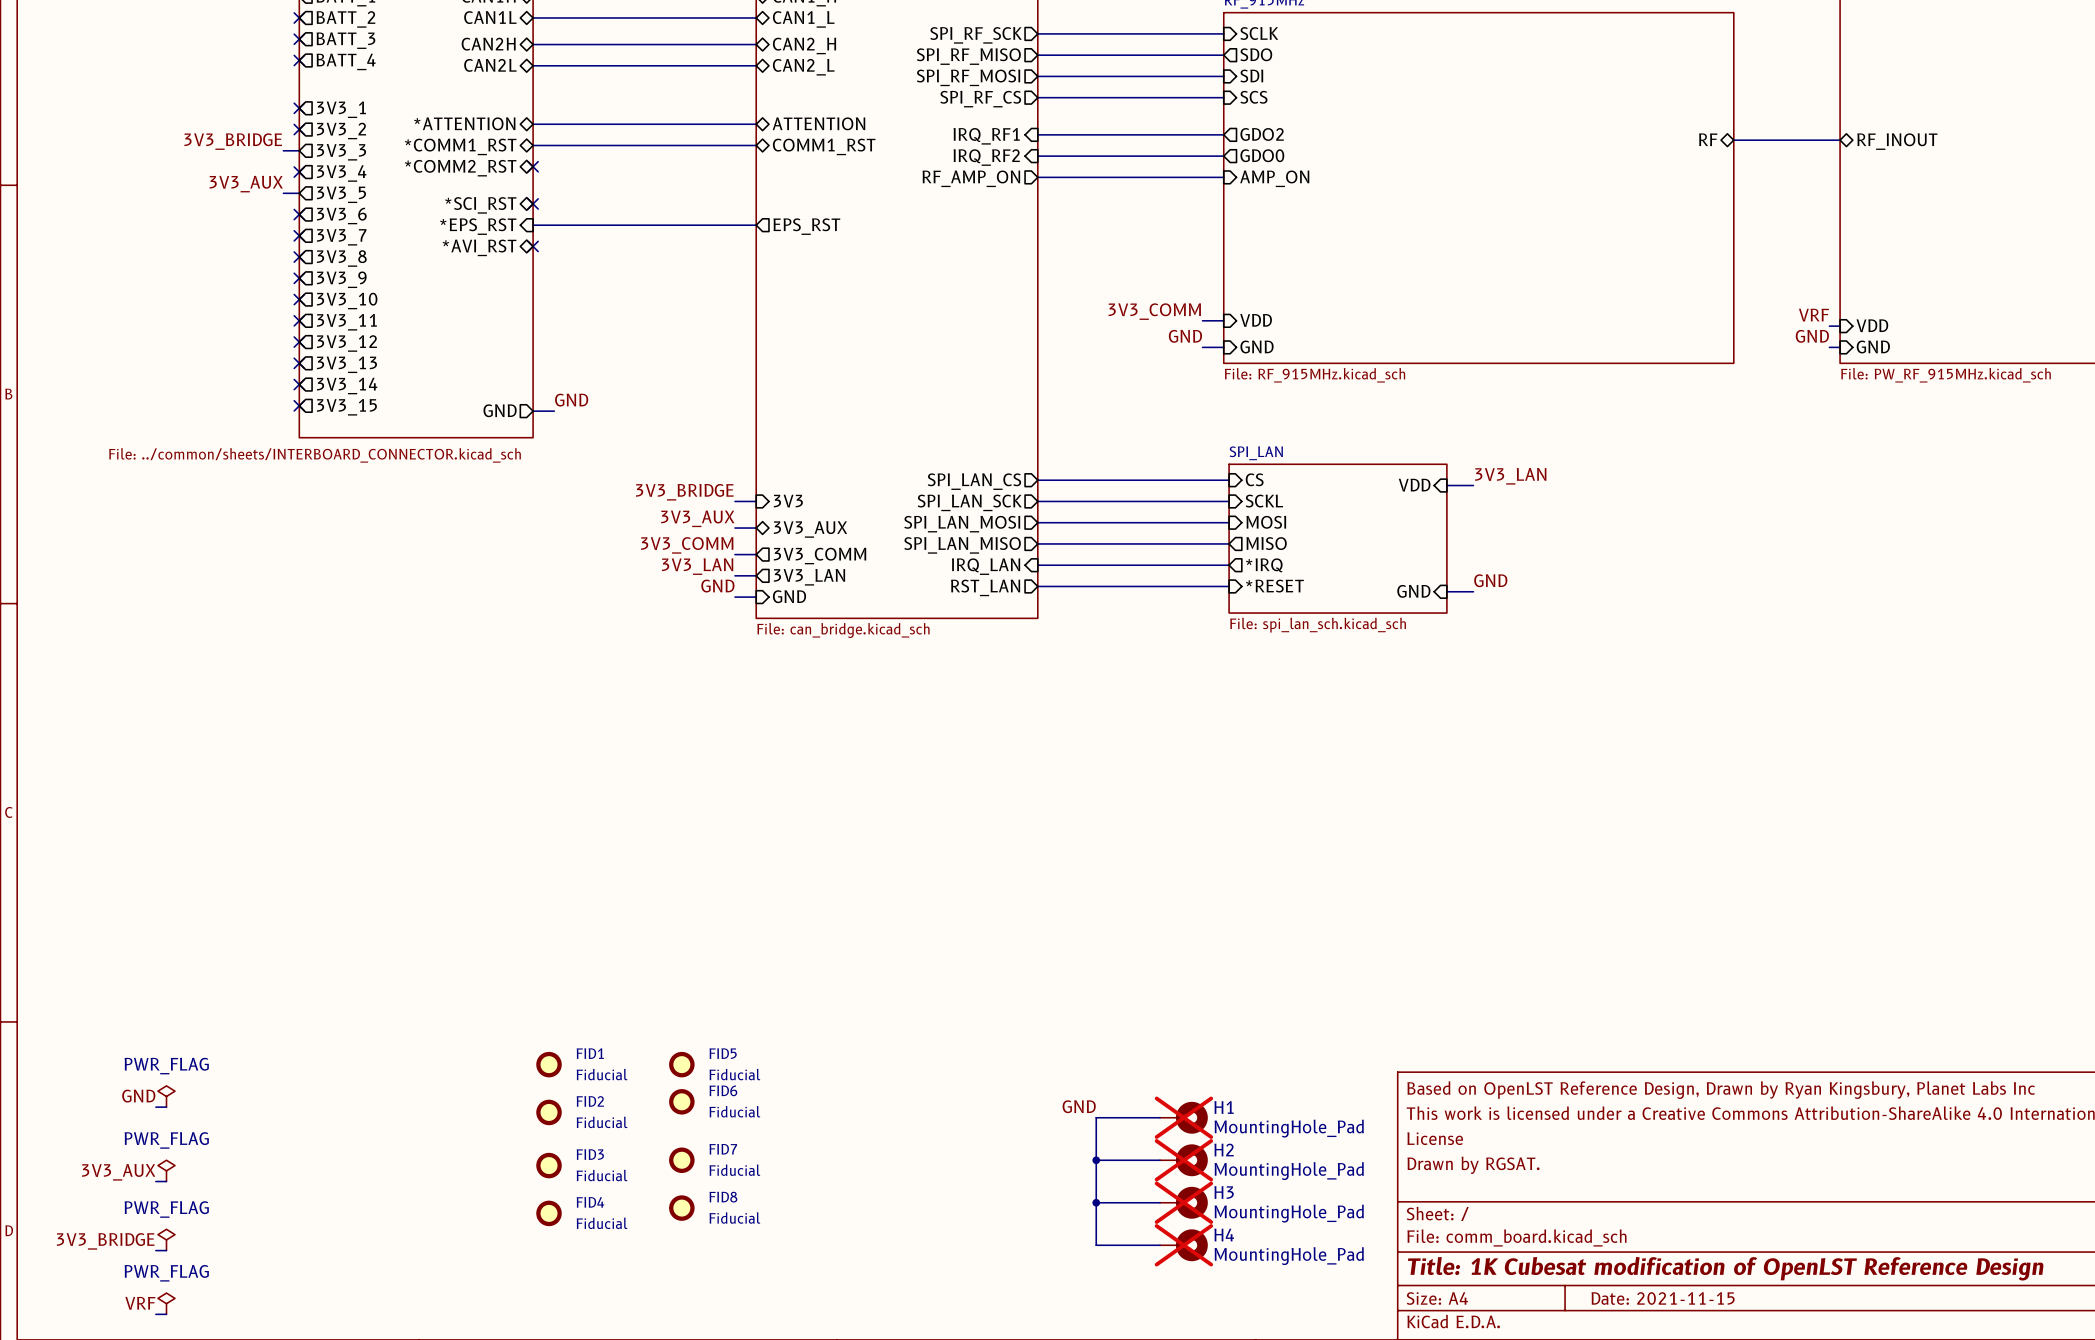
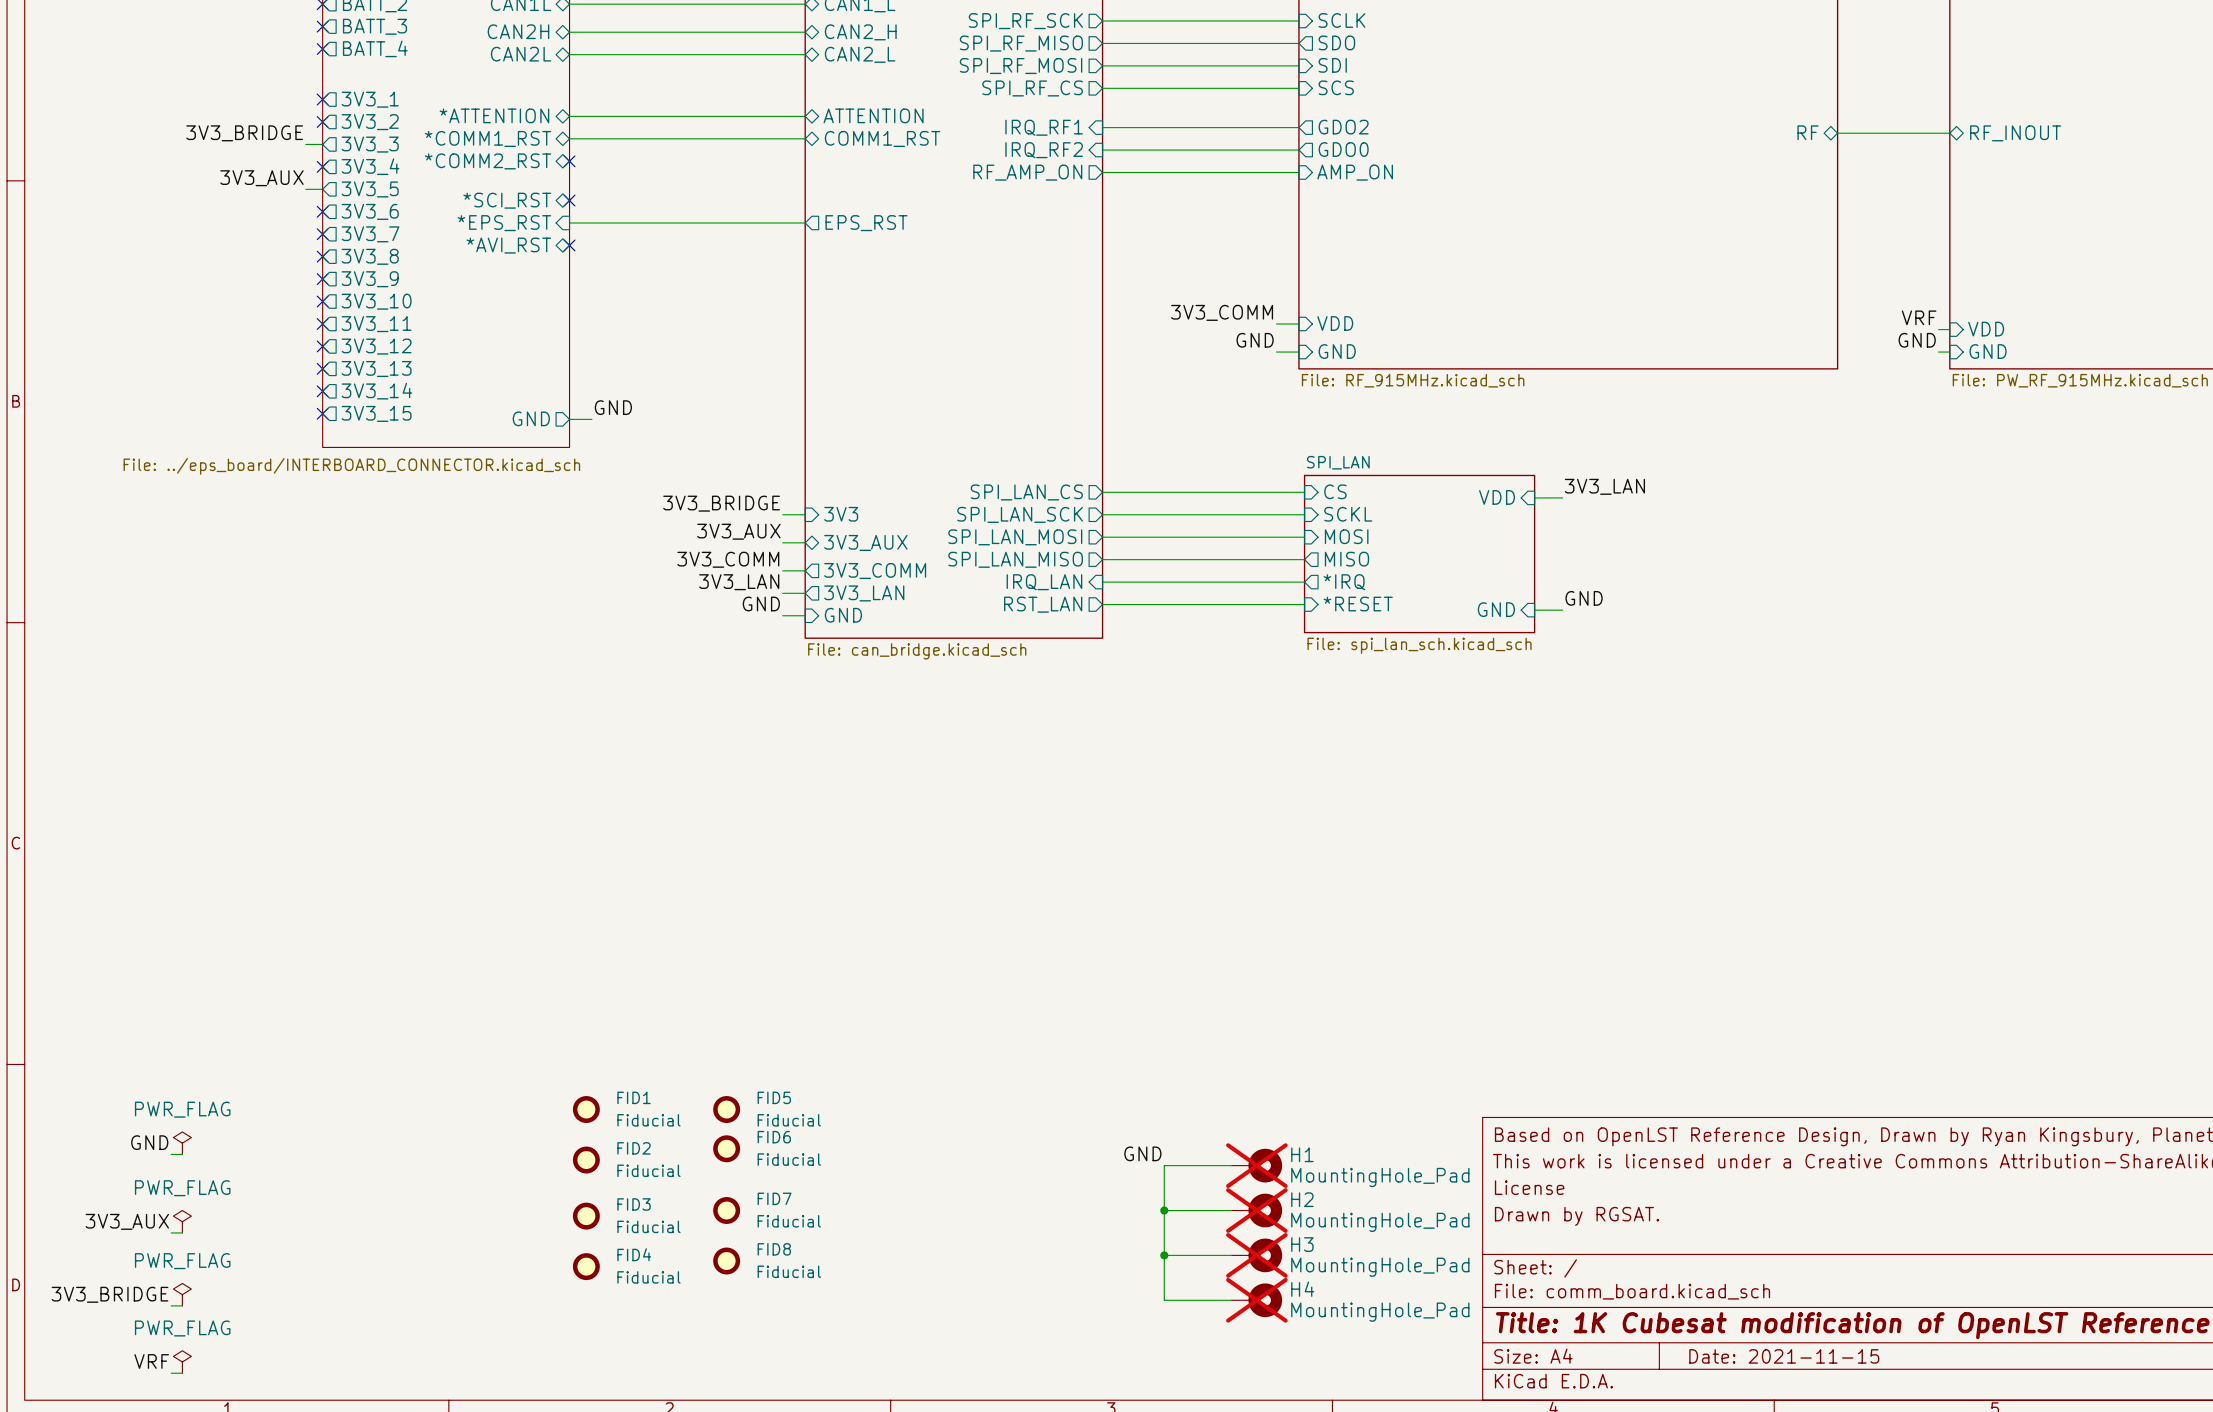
sheet value: File: ../common/sheets/INTERBOARD_CONNECTOR.kicad_sch (315, 455) -> File: ../eps_board/INTERBOARD_CONNECTOR.kicad_sch (351, 466)

